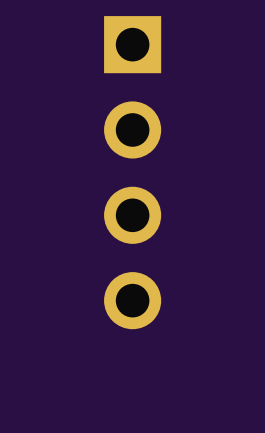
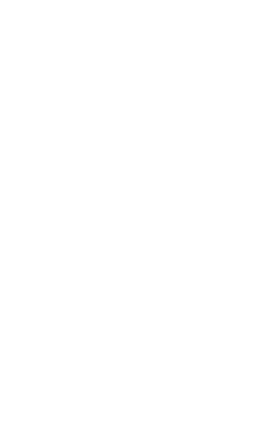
part: (132, 172) -> none

